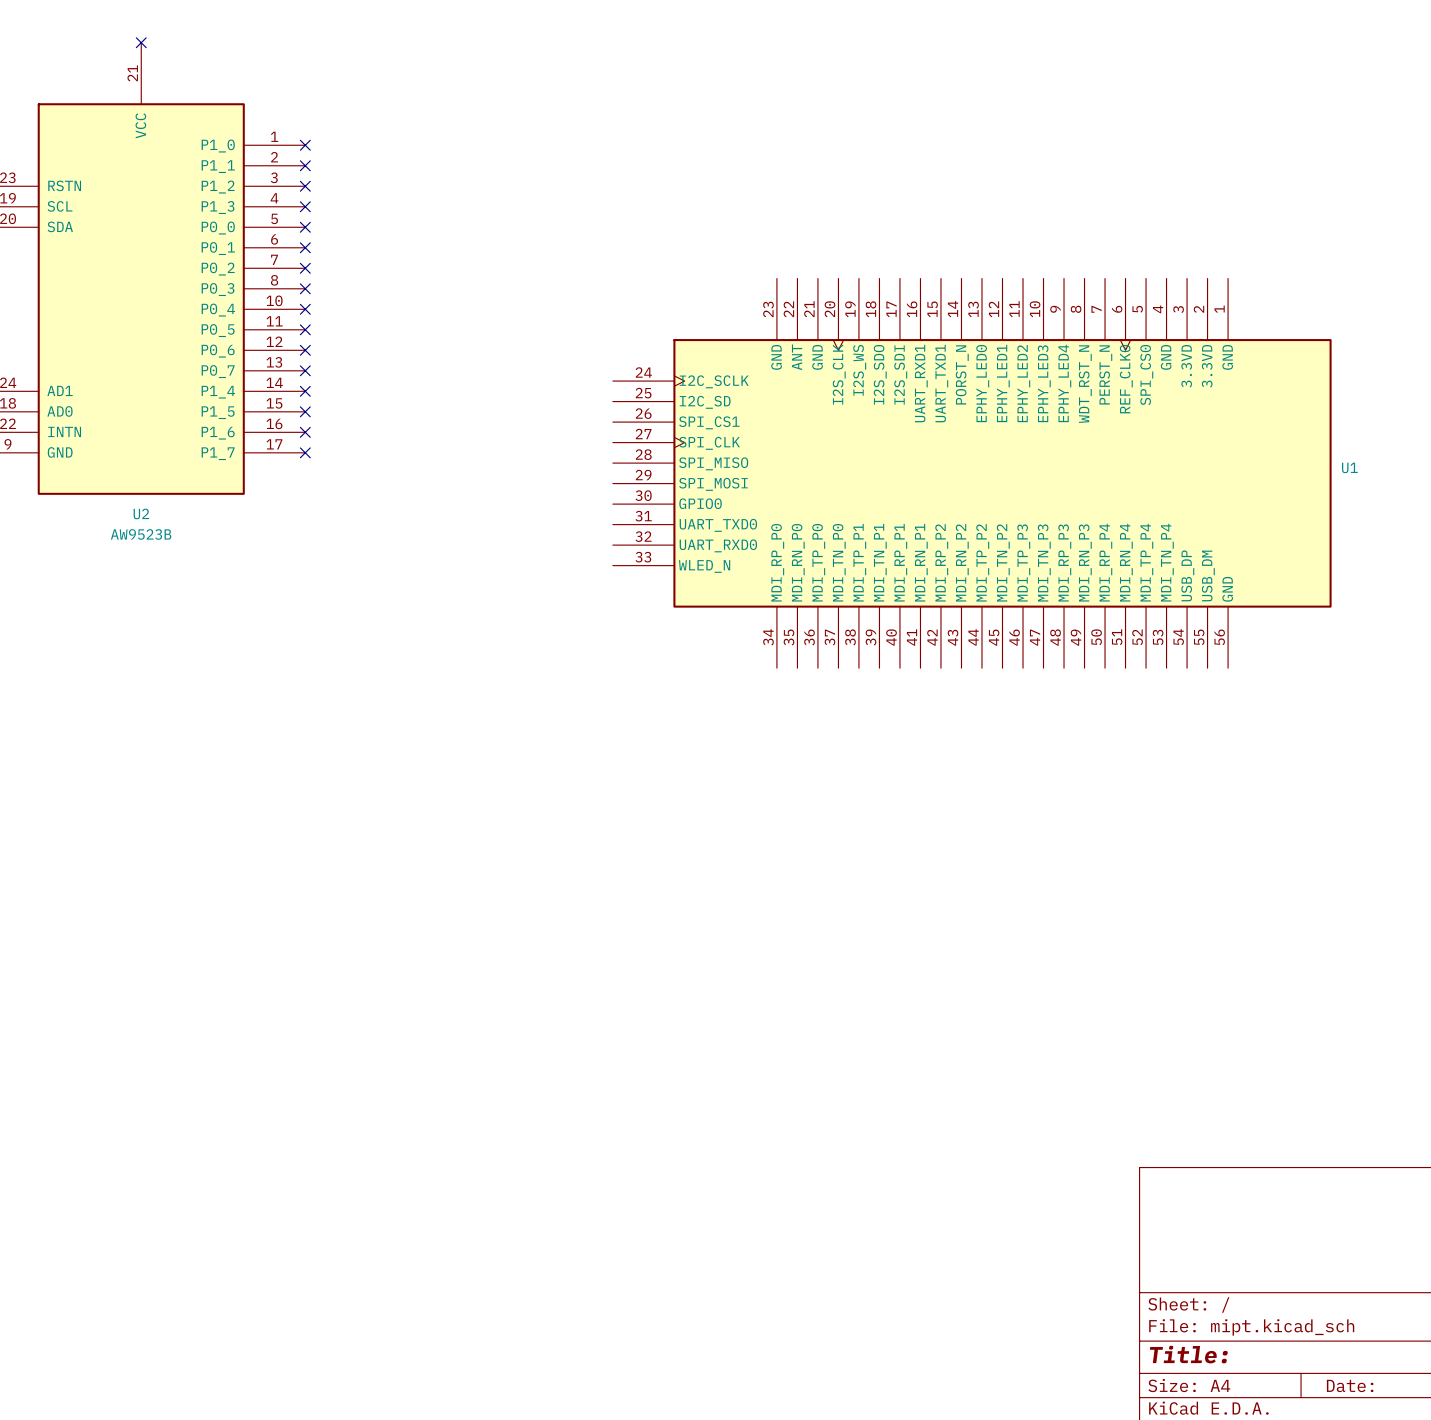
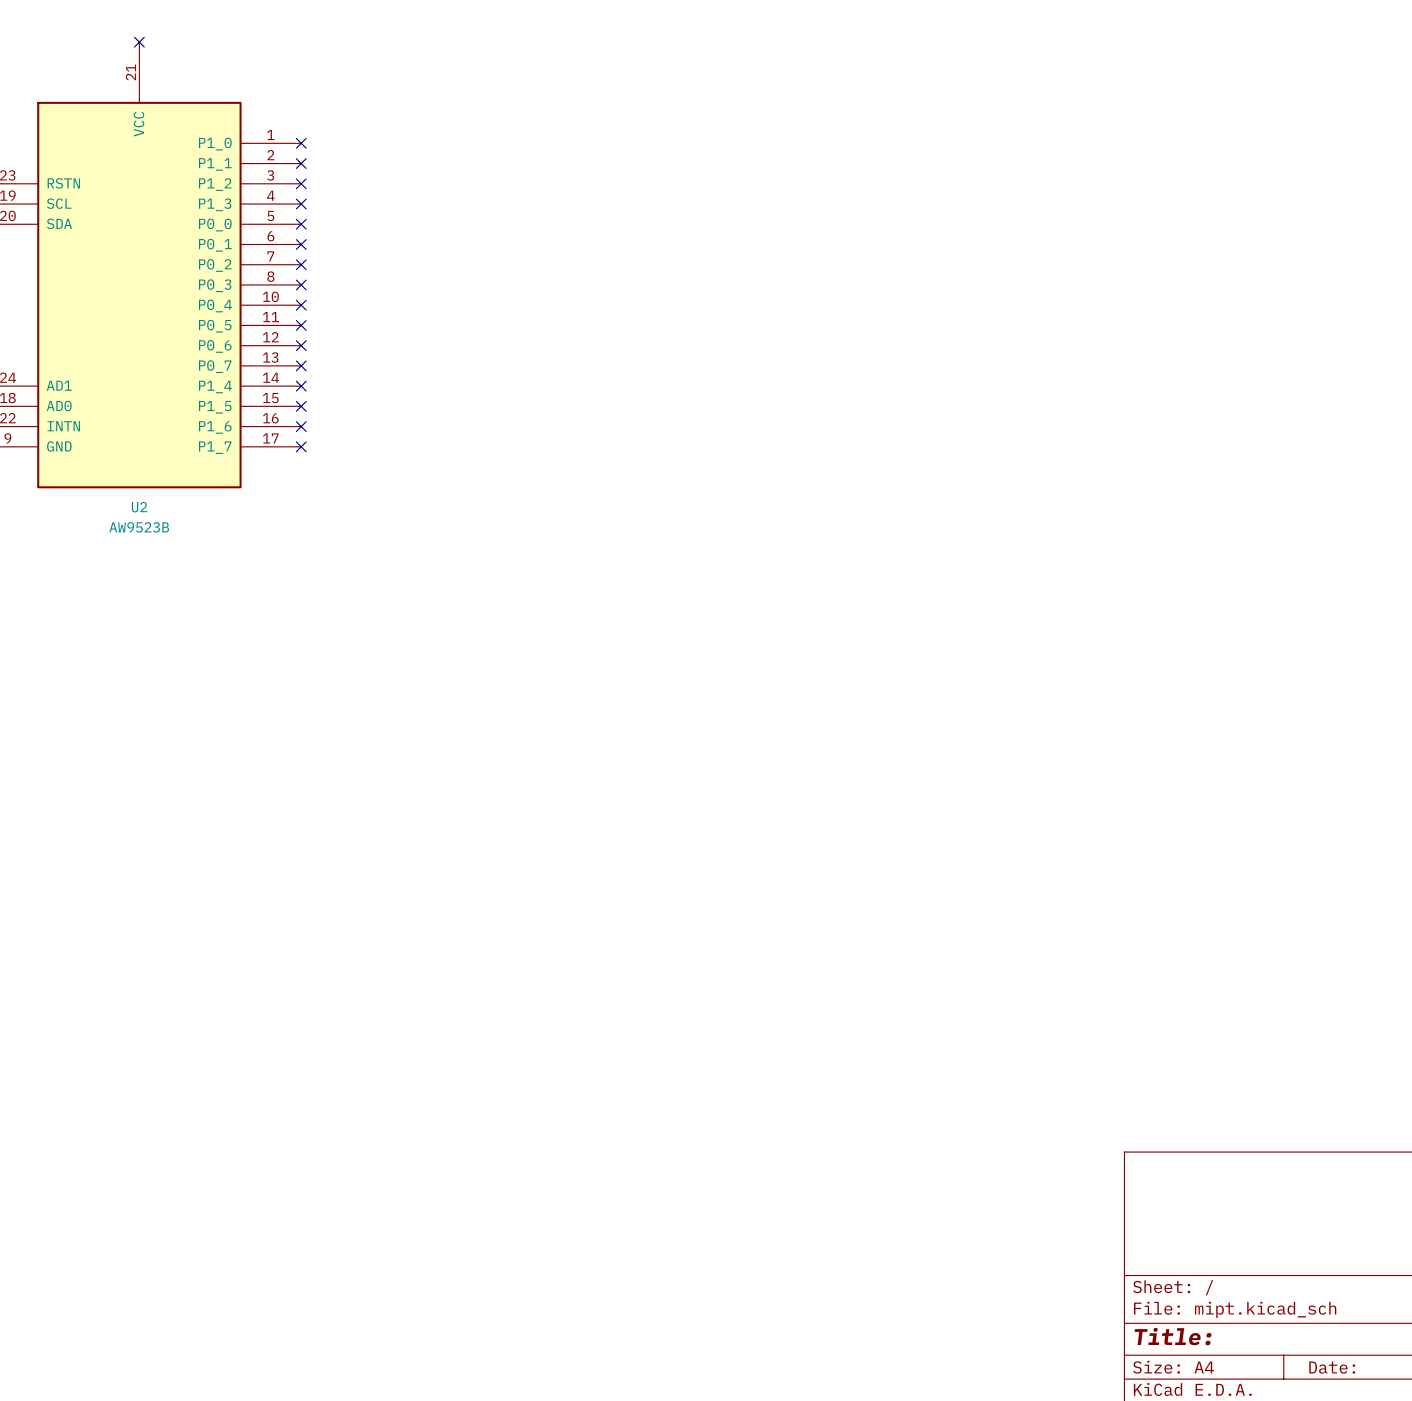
U1: (972, 473) -> none

